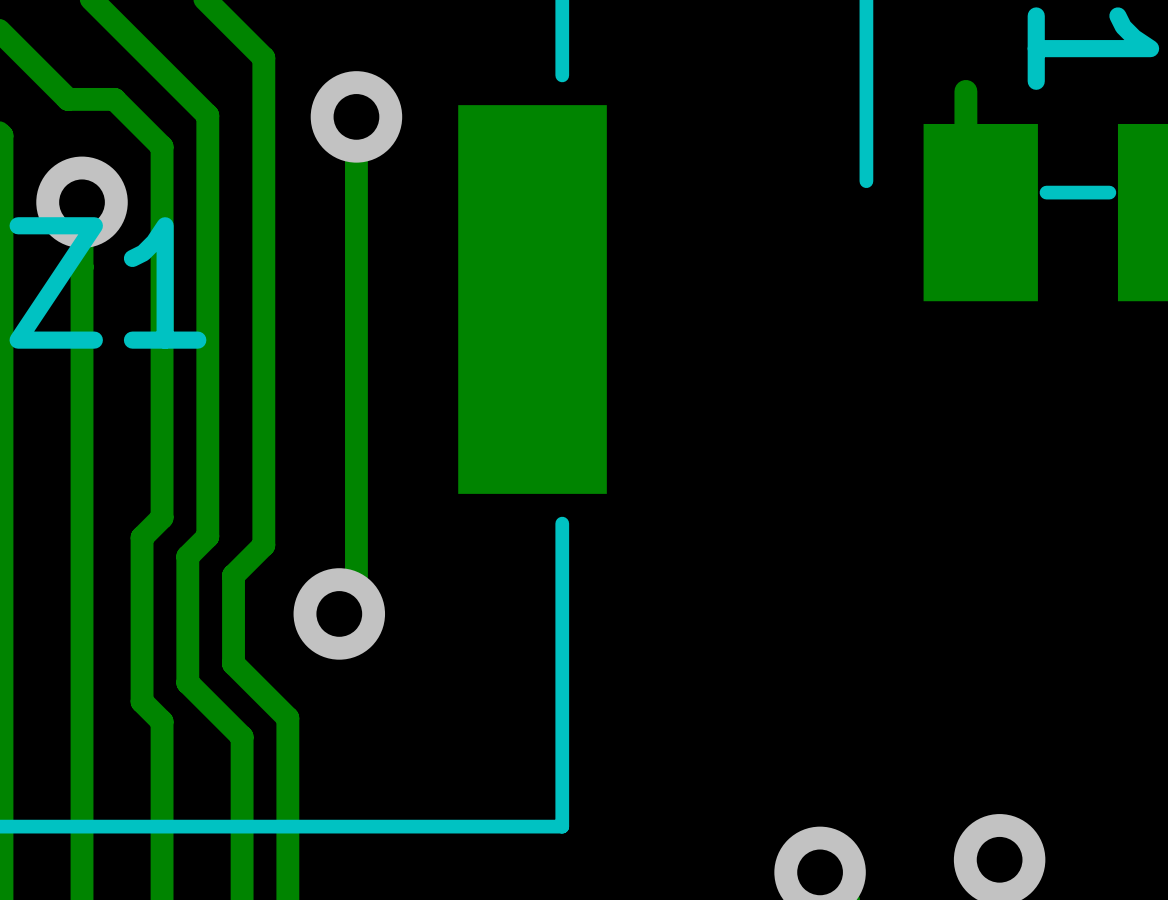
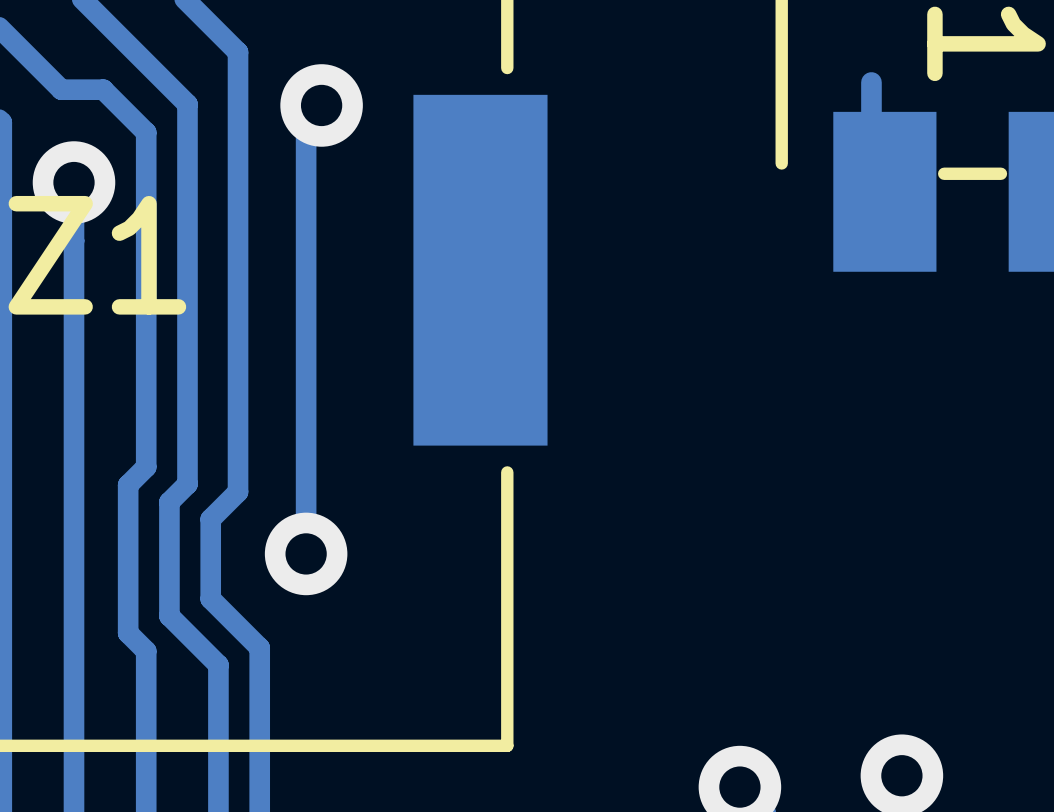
track: (356, 116) (356, 596) (339, 613) -> (321, 105) (306, 120) (306, 553)

